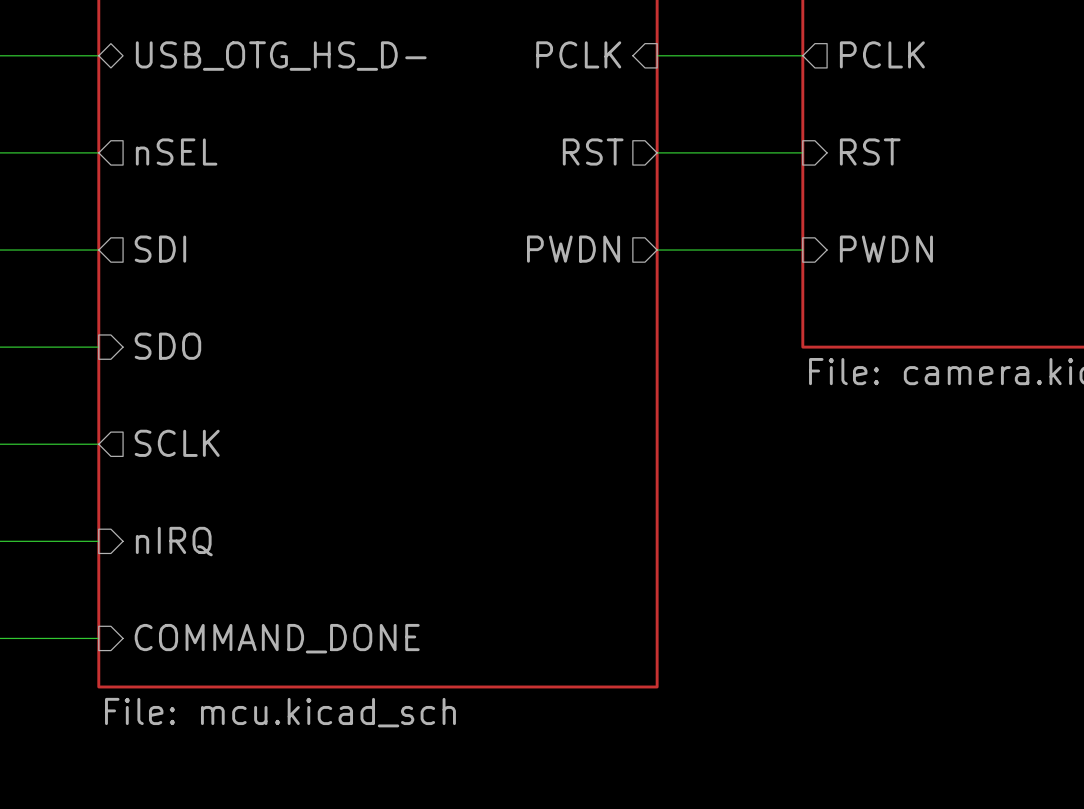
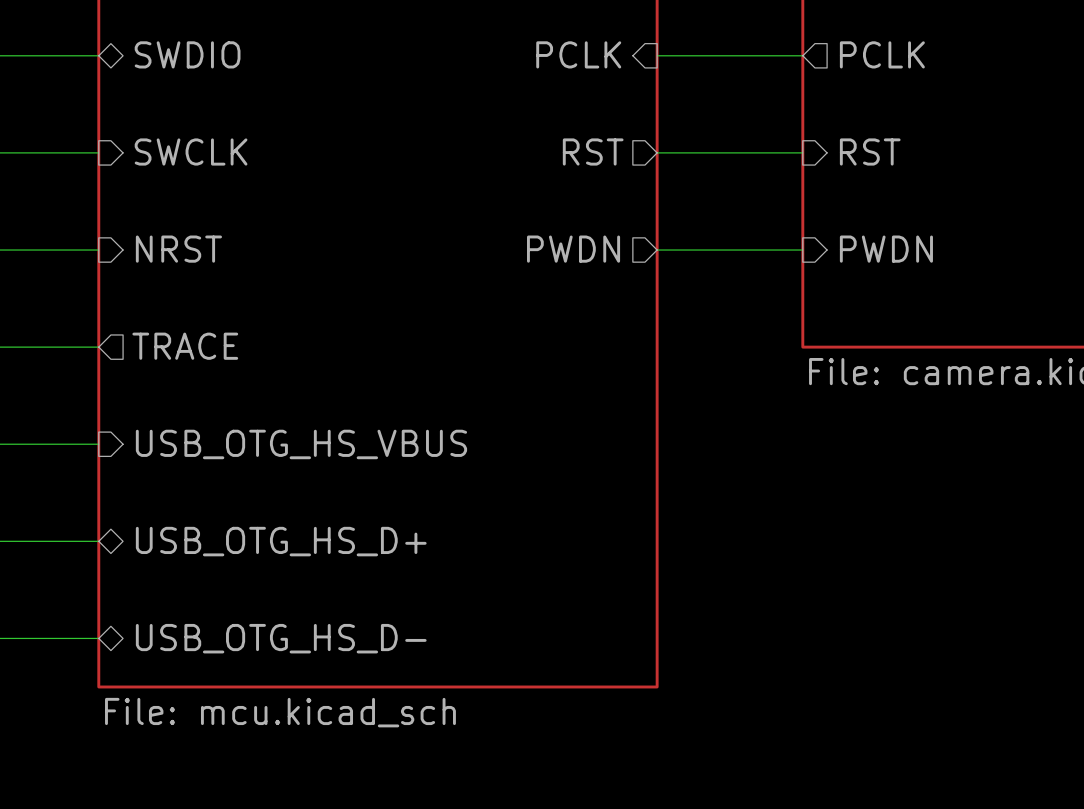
sheet pin: USB_OTG_HS_D- (281, 56) -> SWDIO (187, 54)
sheet pin shape: output (176, 151) -> input (191, 151)
sheet pin: nSEL (176, 151) -> SWCLK (191, 151)
sheet pin shape: output (160, 249) -> input (178, 249)
sheet pin: SDI (160, 249) -> NRST (178, 249)
sheet pin shape: input (167, 346) -> output (185, 346)
sheet pin: SDO (167, 346) -> TRACE (185, 346)
sheet pin shape: output (177, 443) -> input (301, 444)
sheet pin: SCLK (177, 443) -> USB_OTG_HS_VBUS (301, 444)
sheet pin shape: input (174, 541) -> bidirectional (281, 541)
sheet pin: nIRQ (174, 541) -> USB_OTG_HS_D+ (281, 541)
sheet pin shape: input (277, 638) -> bidirectional (281, 638)
sheet pin: COMMAND_DONE (277, 638) -> USB_OTG_HS_D- (281, 638)

